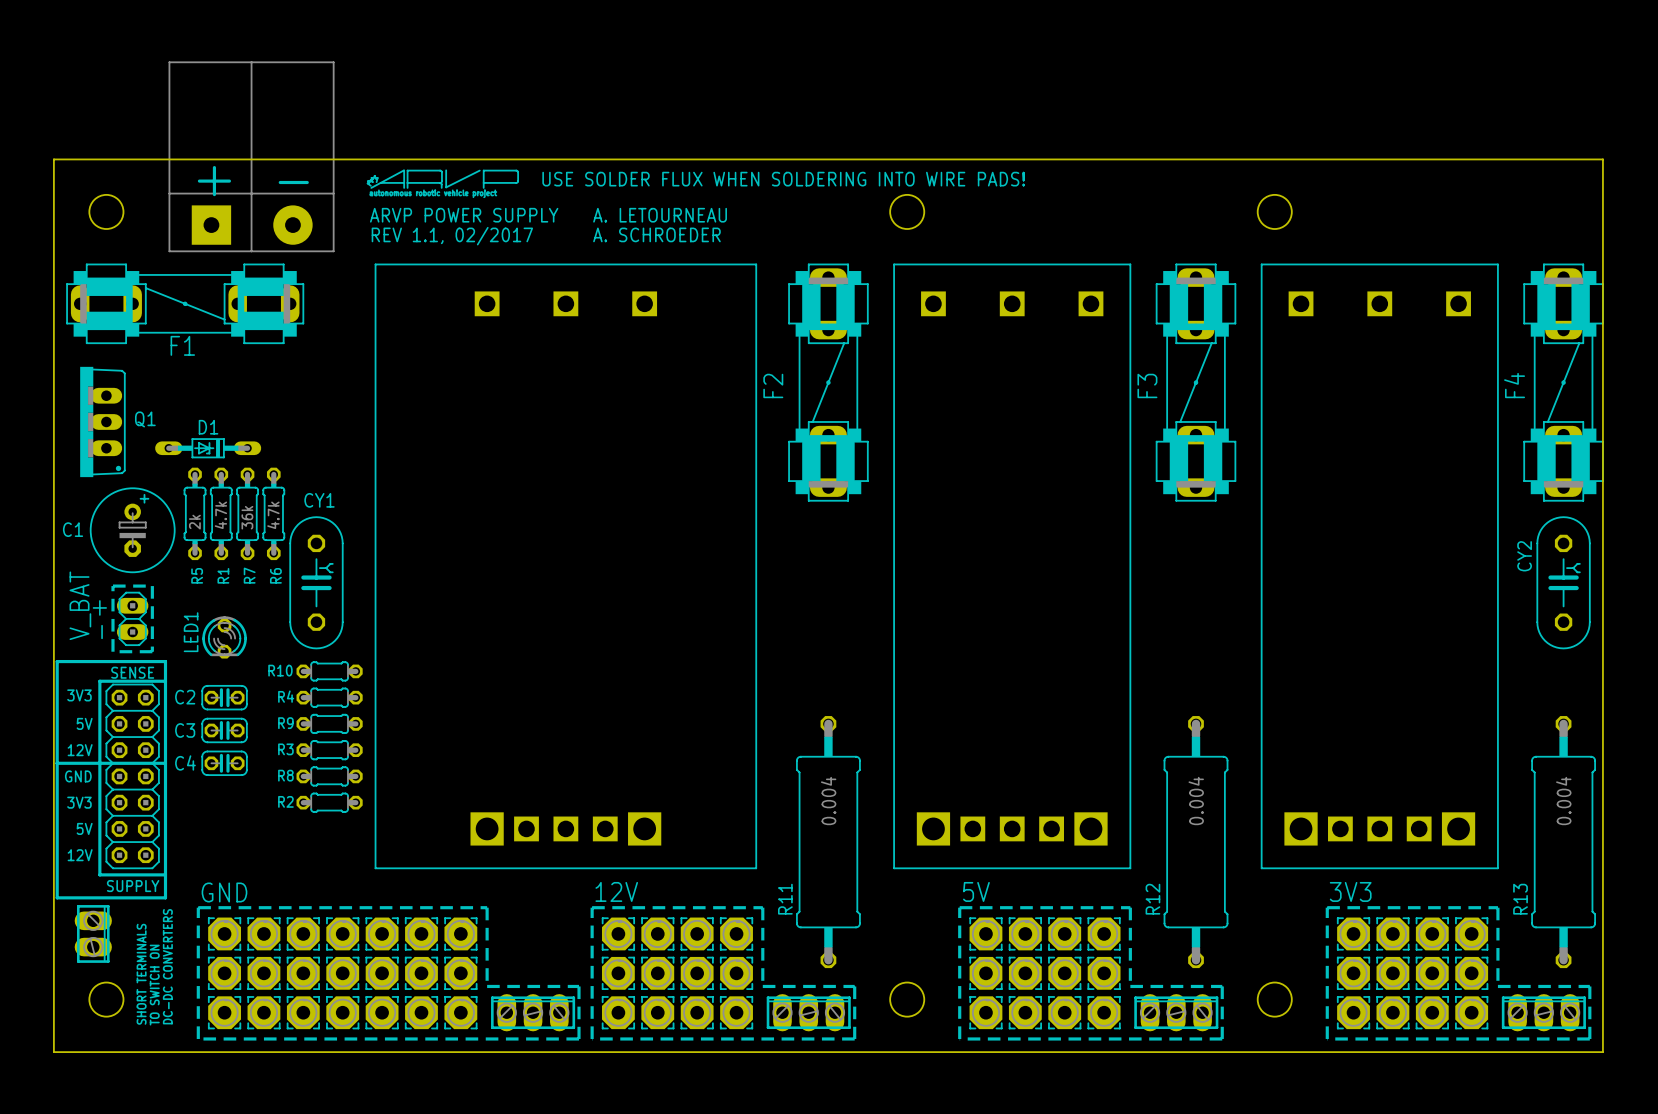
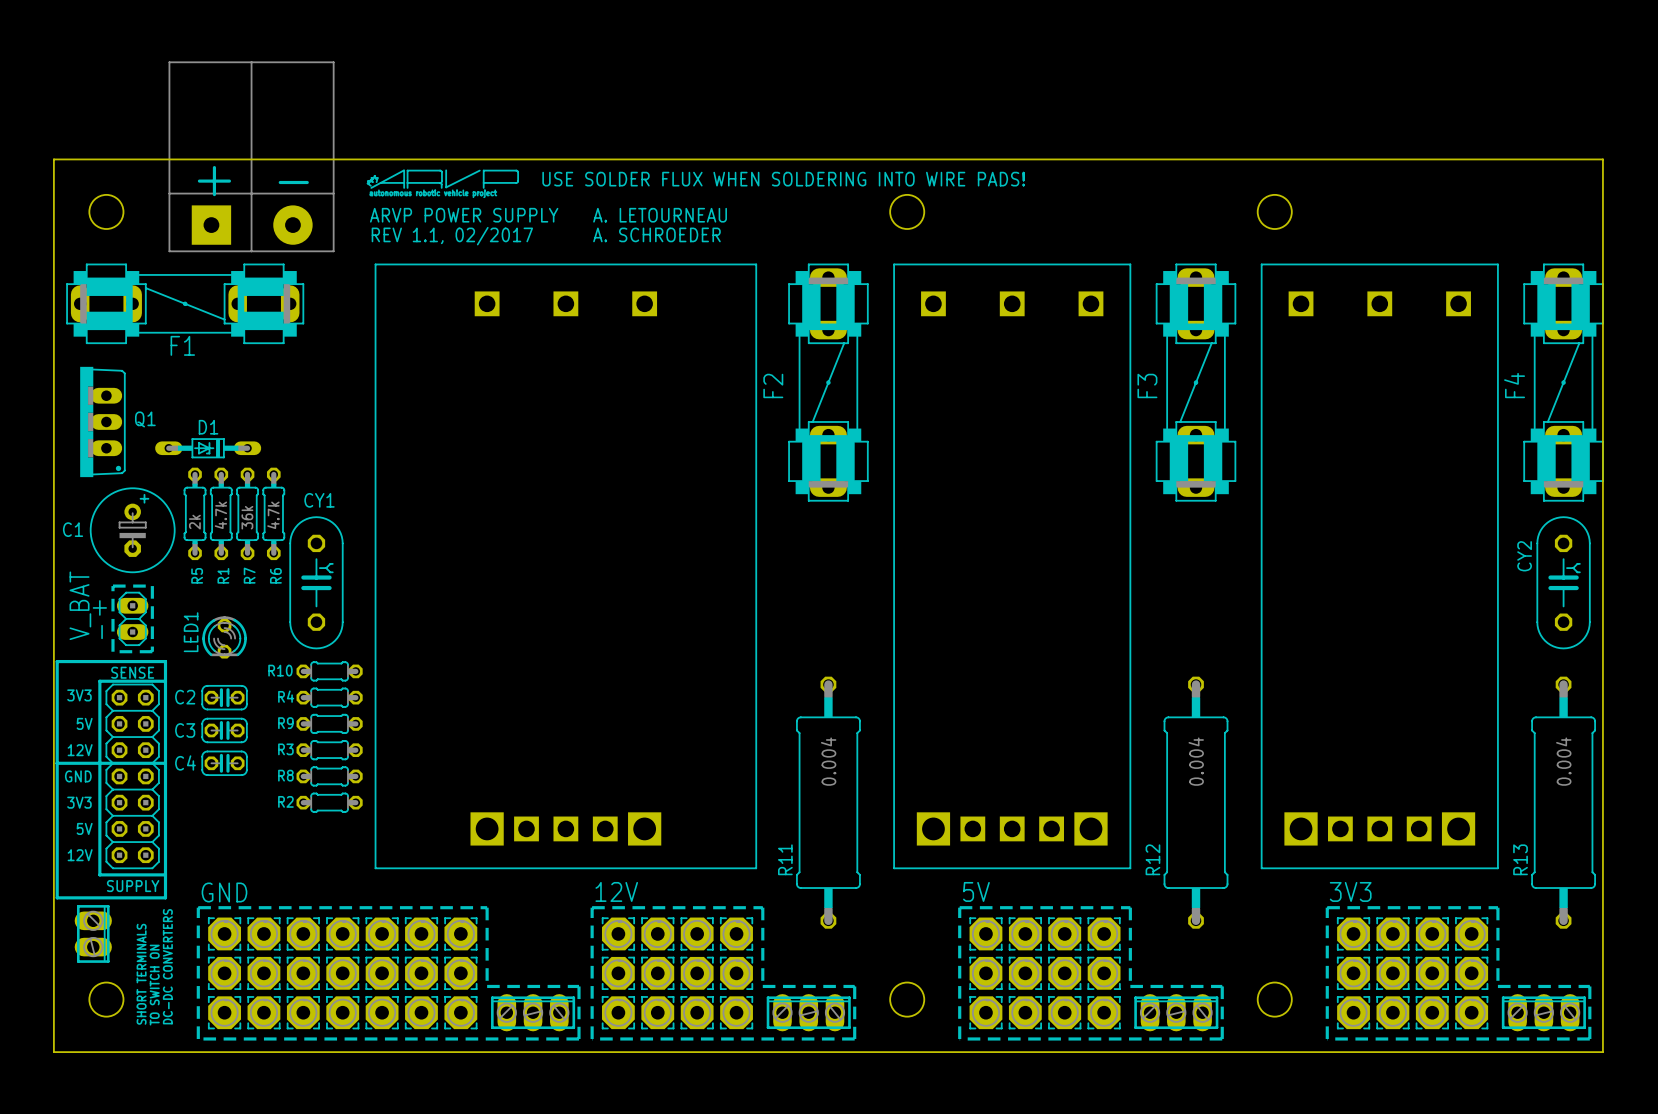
R11 position: (828, 842) -> (828, 802)
R12 position: (1196, 842) -> (1196, 802)
R13 position: (1563, 842) -> (1563, 802)

